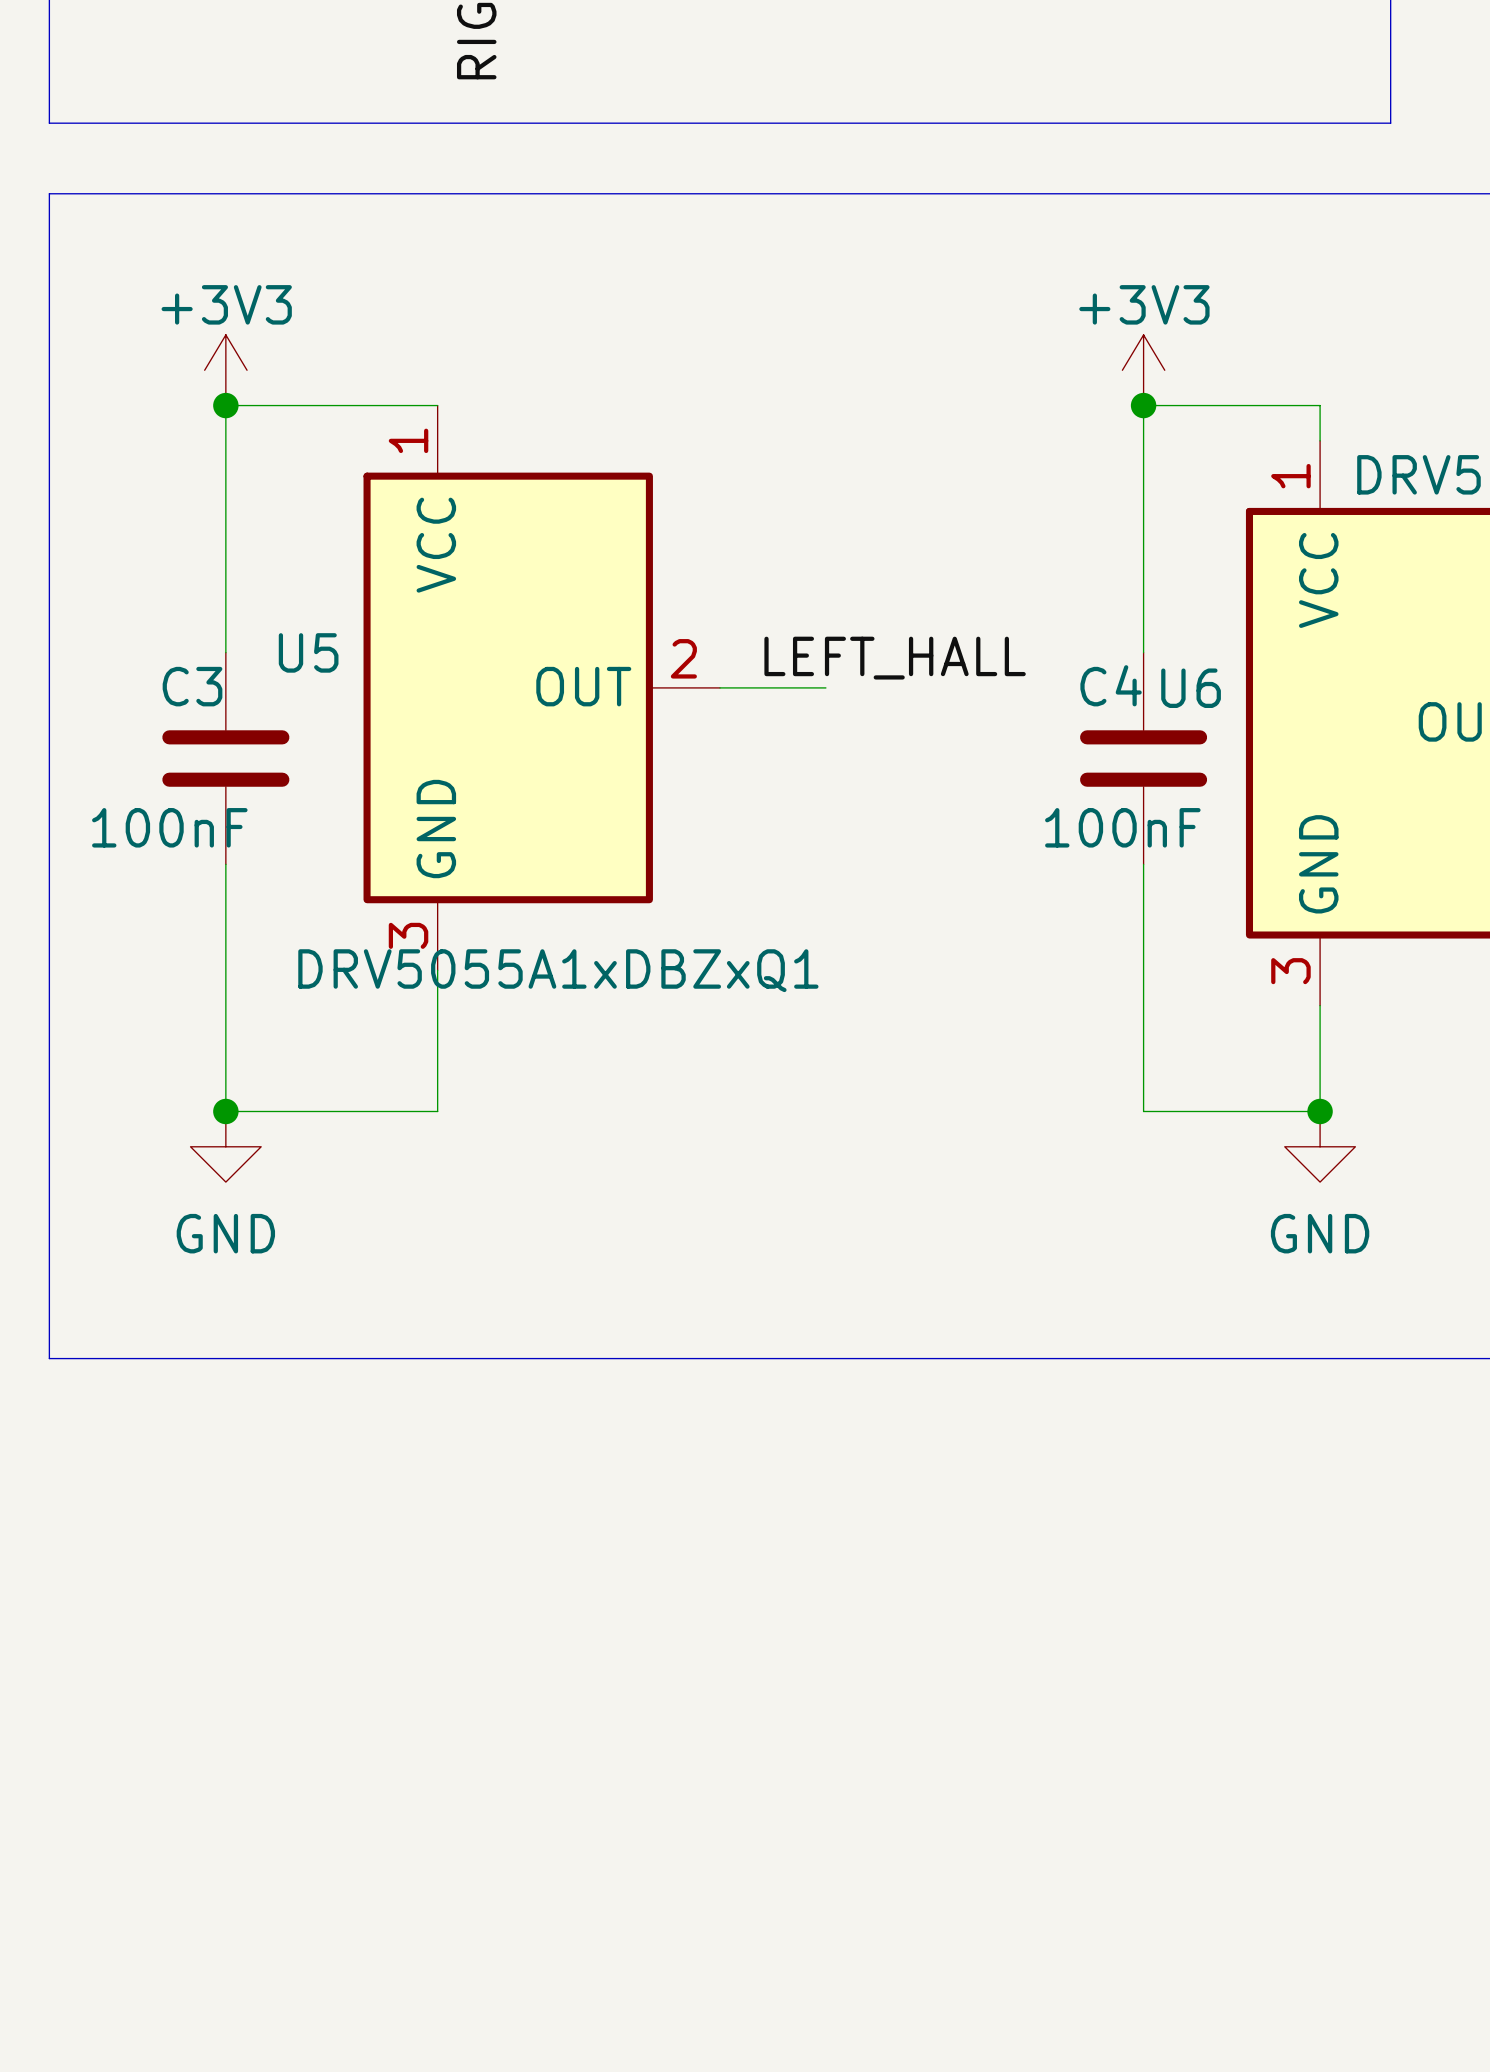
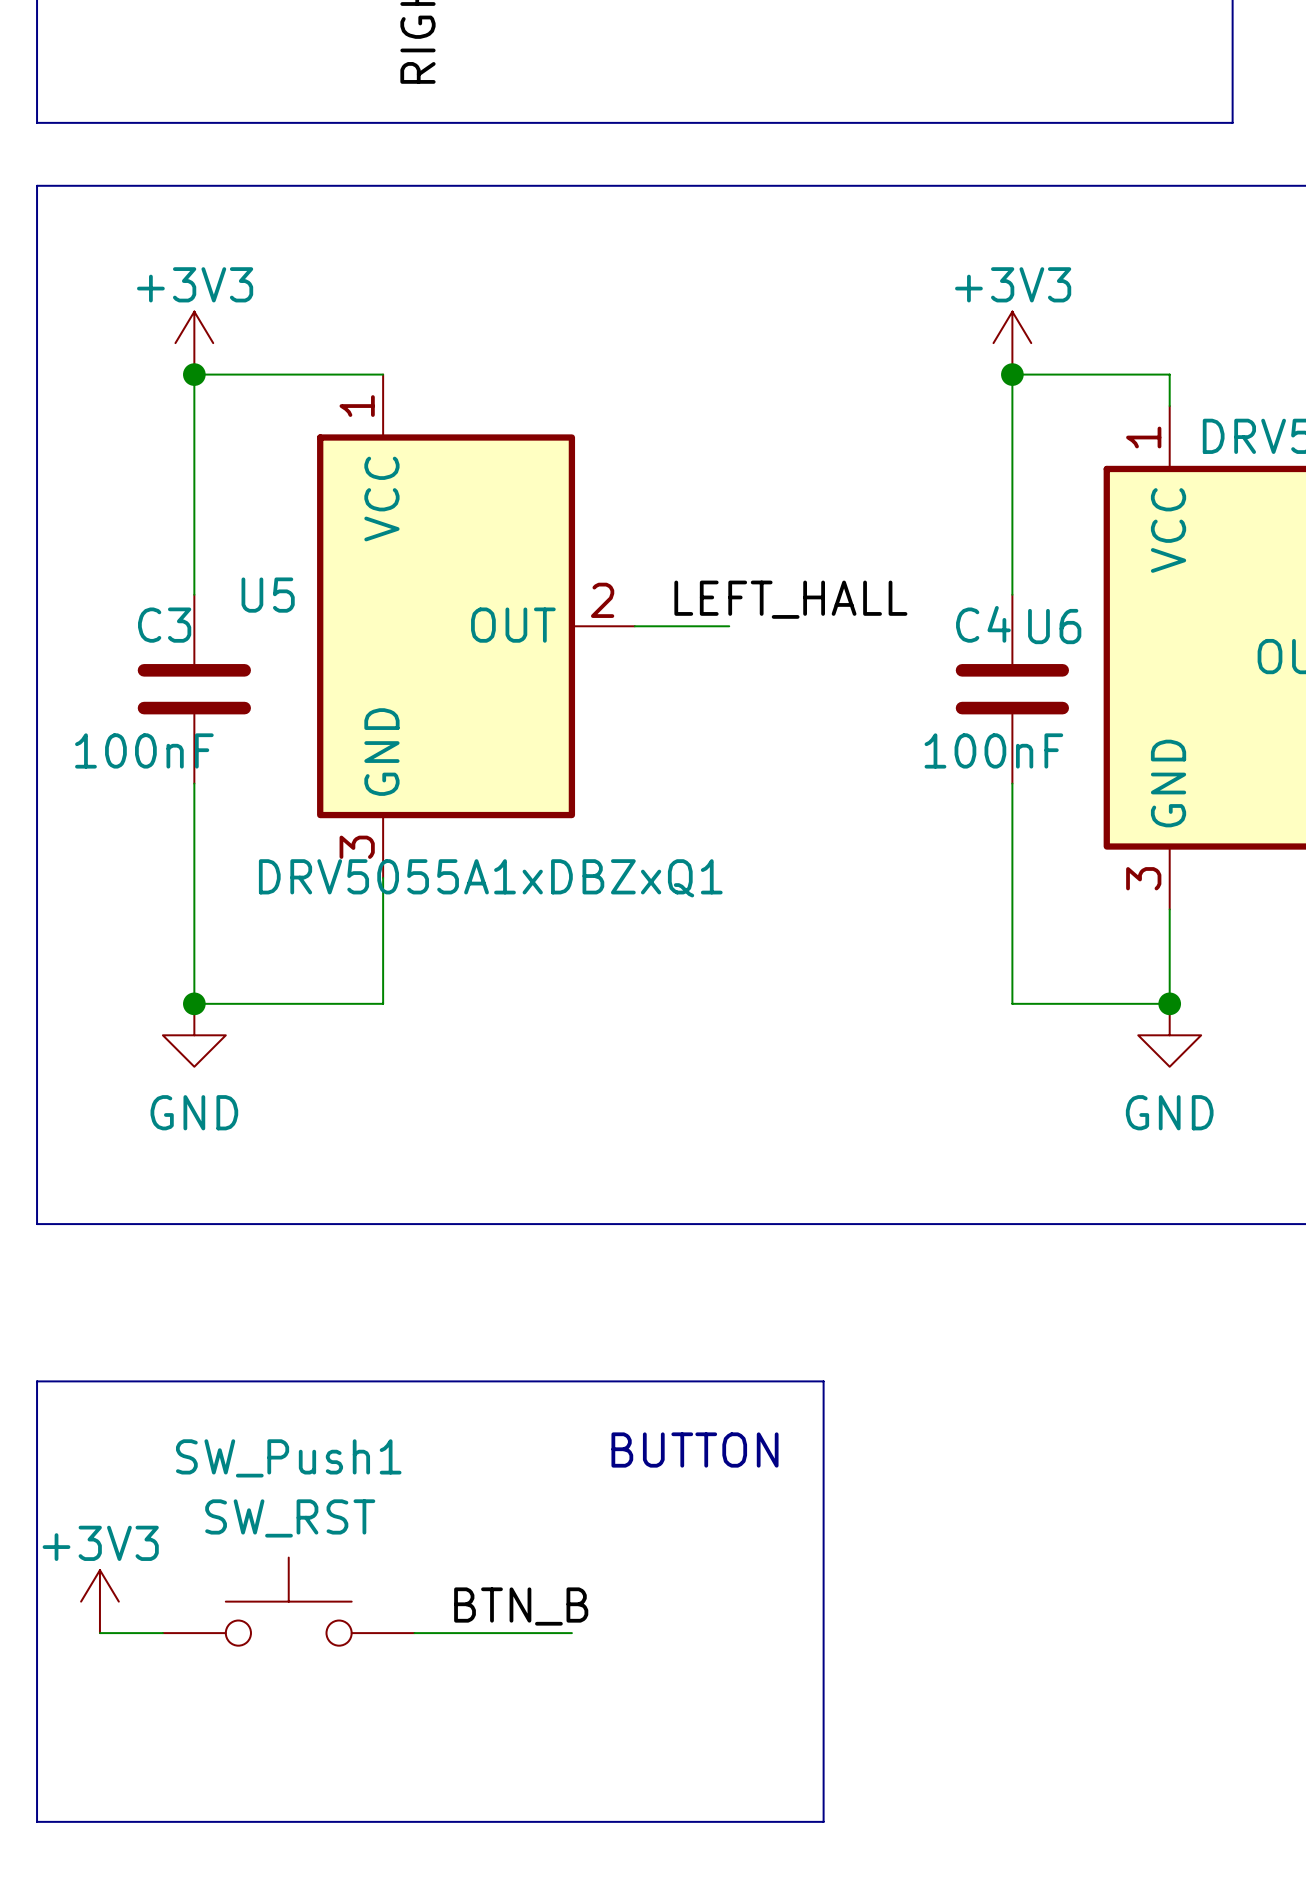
line: none -> (37, 1381) (823, 1381) (823, 1821) (37, 1821) (37, 1381)
text: none -> BUTTON (695, 1450)
power symbol: none -> +3V3 (99, 1601)
SW_Push1: none -> SW_RST (288, 1601)
label: none -> BTN_B (521, 1606)
wire: none -> (99, 1633) (162, 1633)
wire: none -> (414, 1633) (571, 1633)

